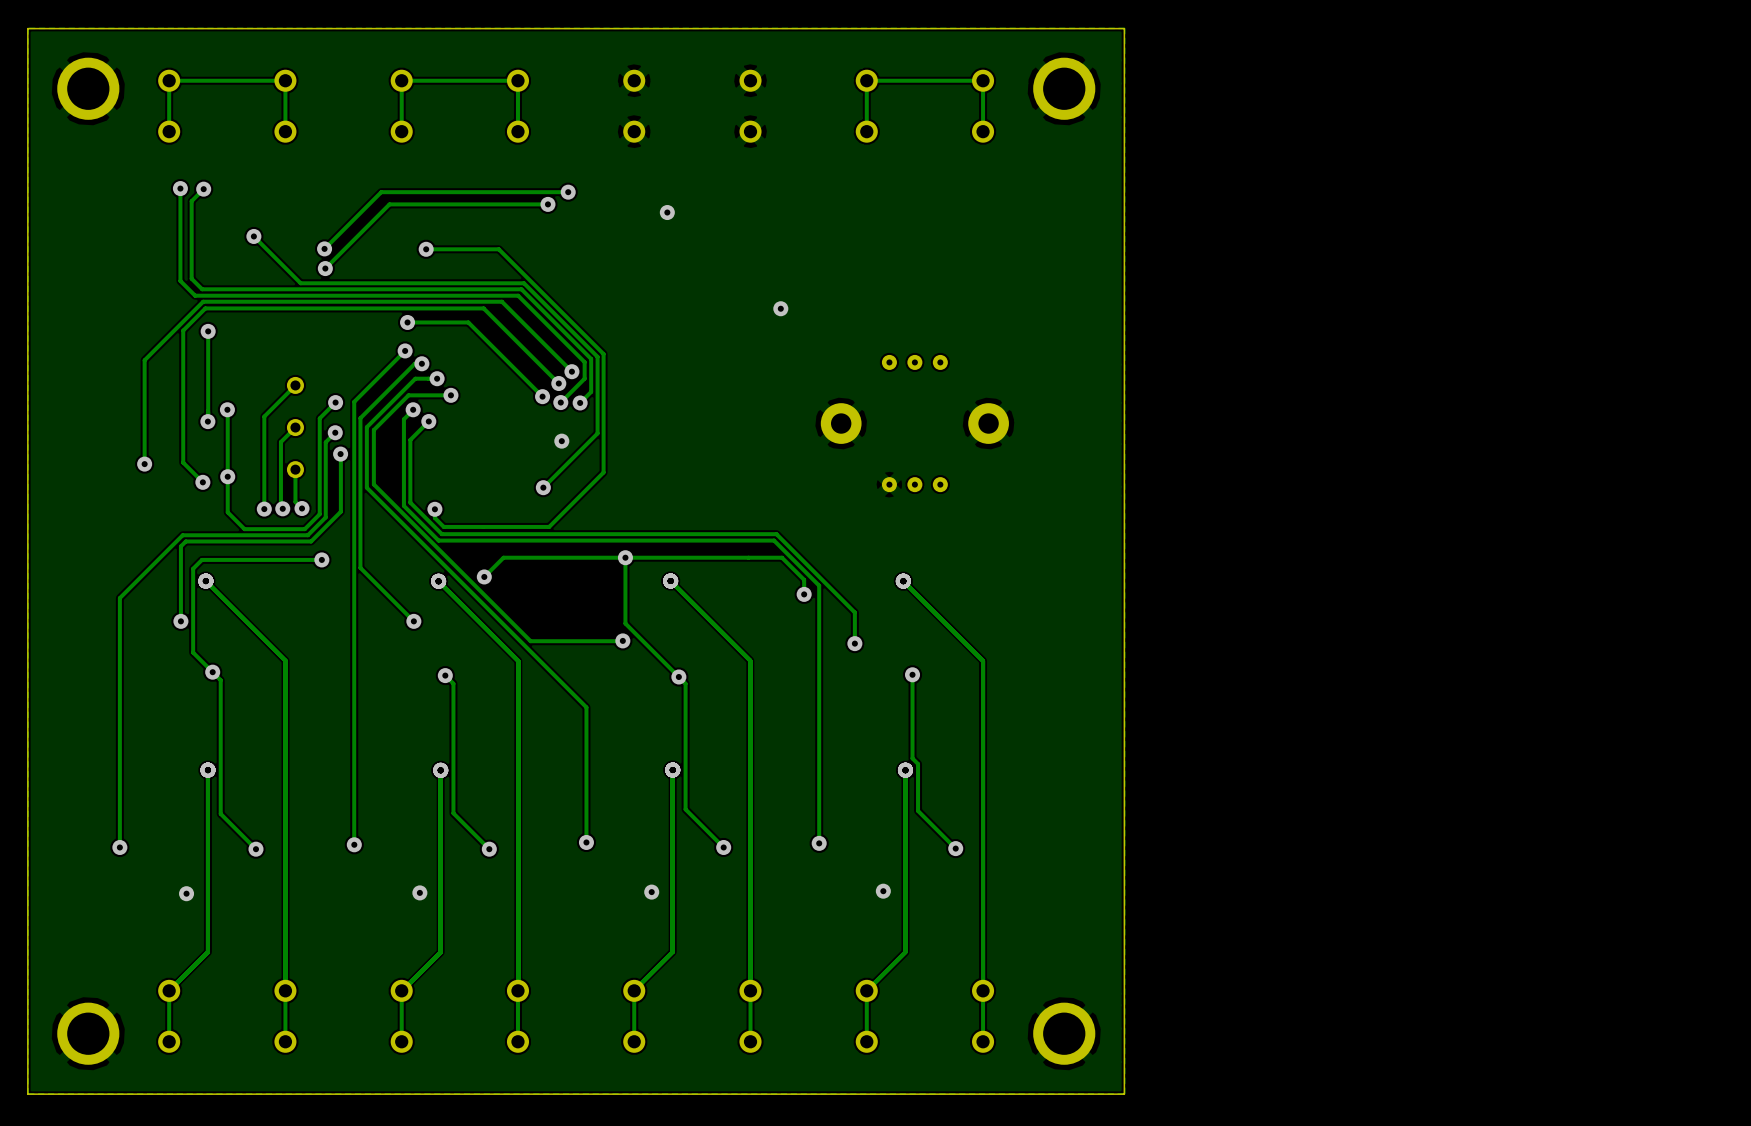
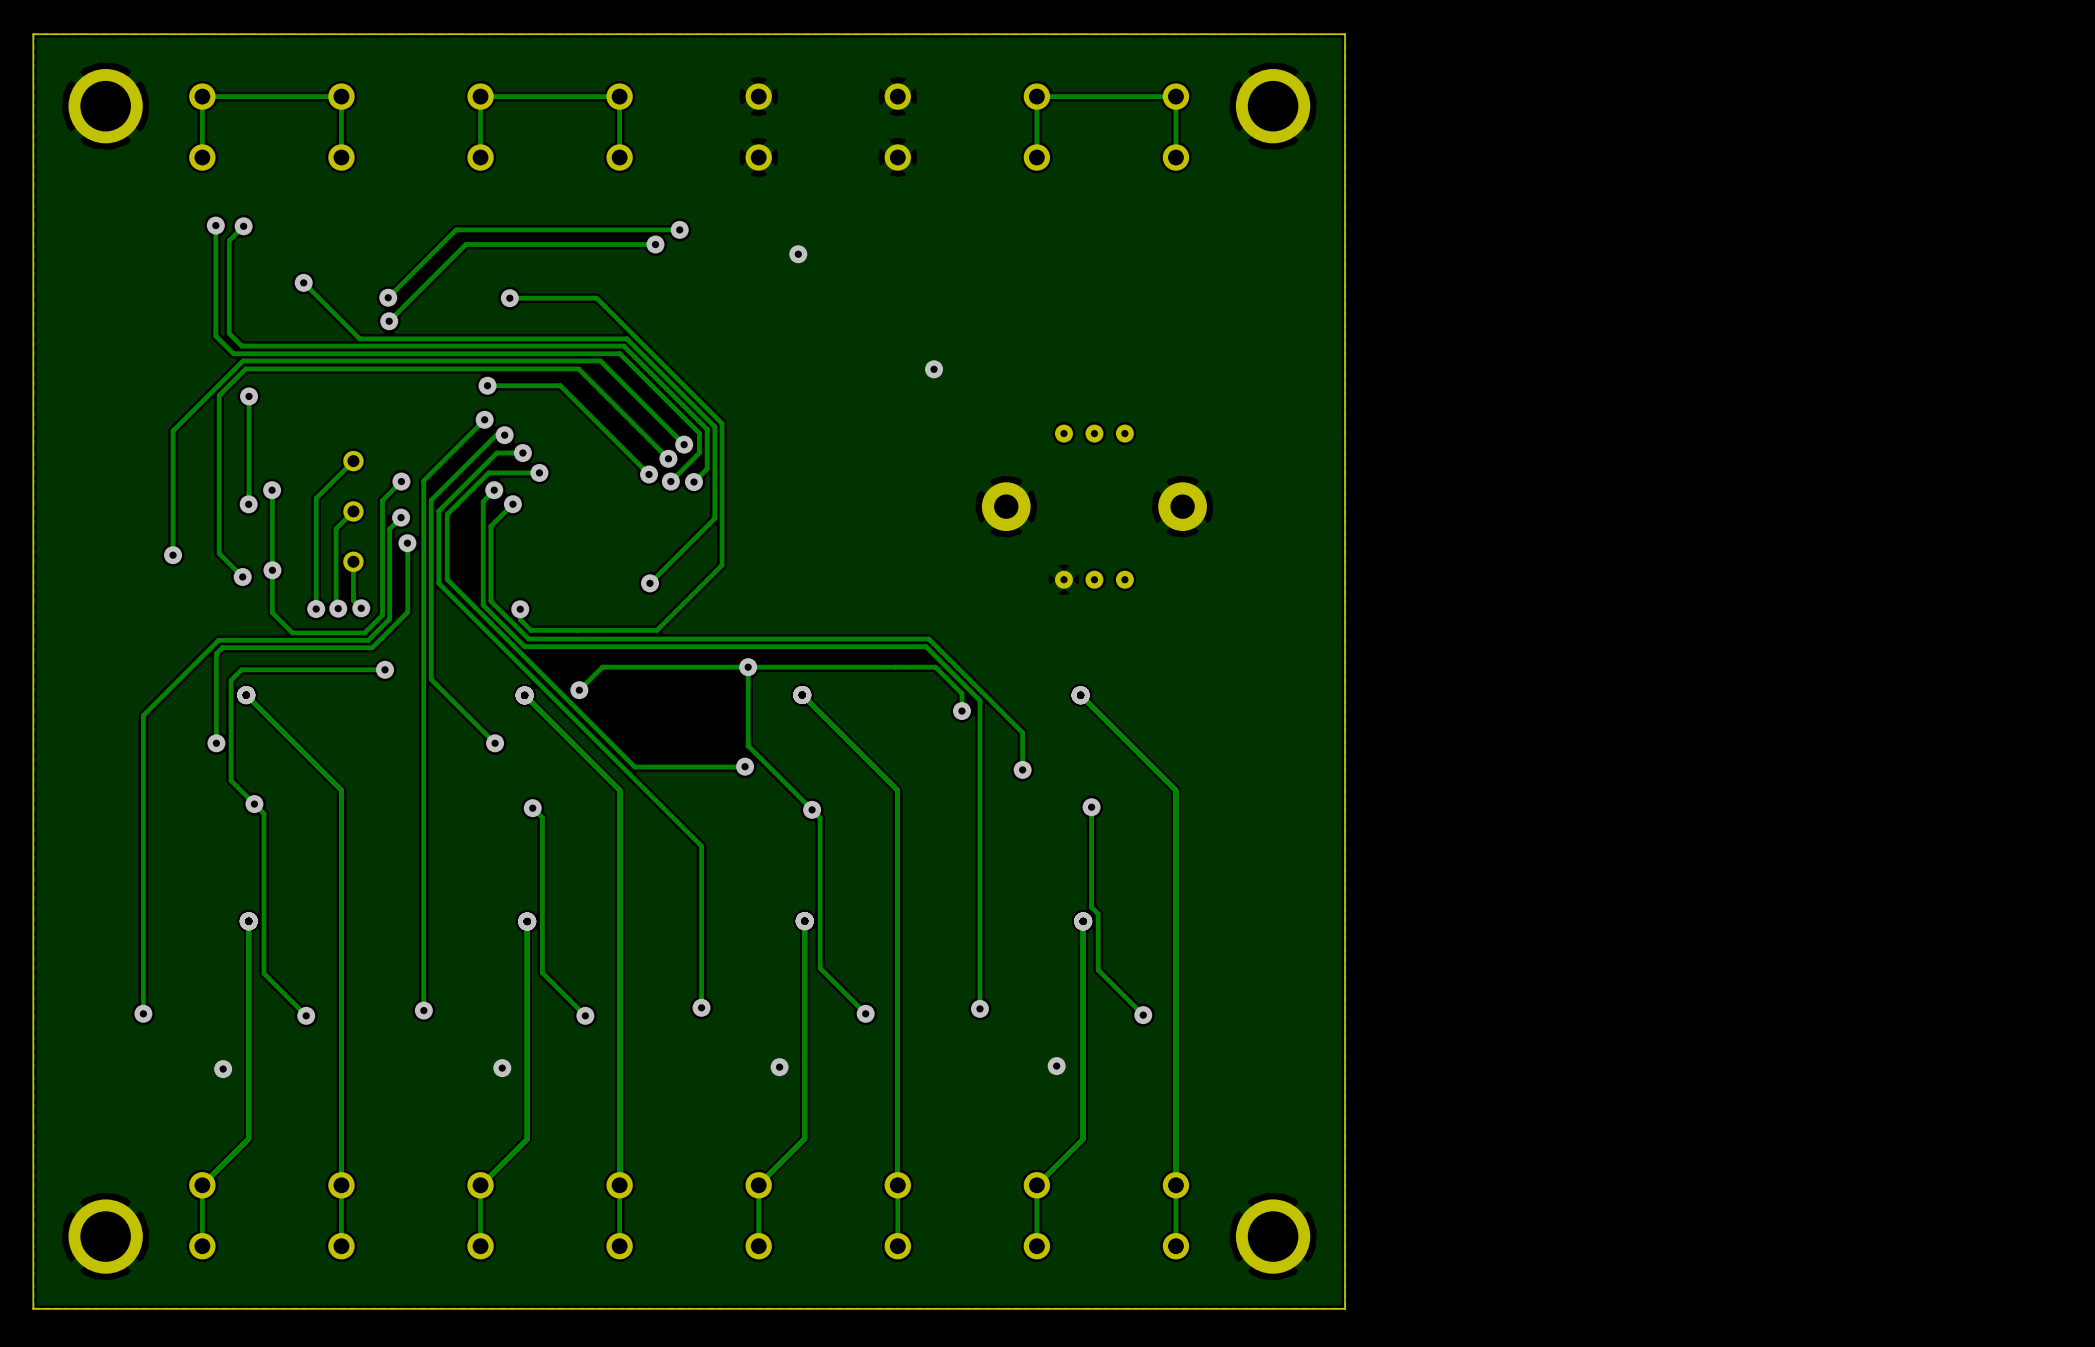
via: (561, 441) -> none

